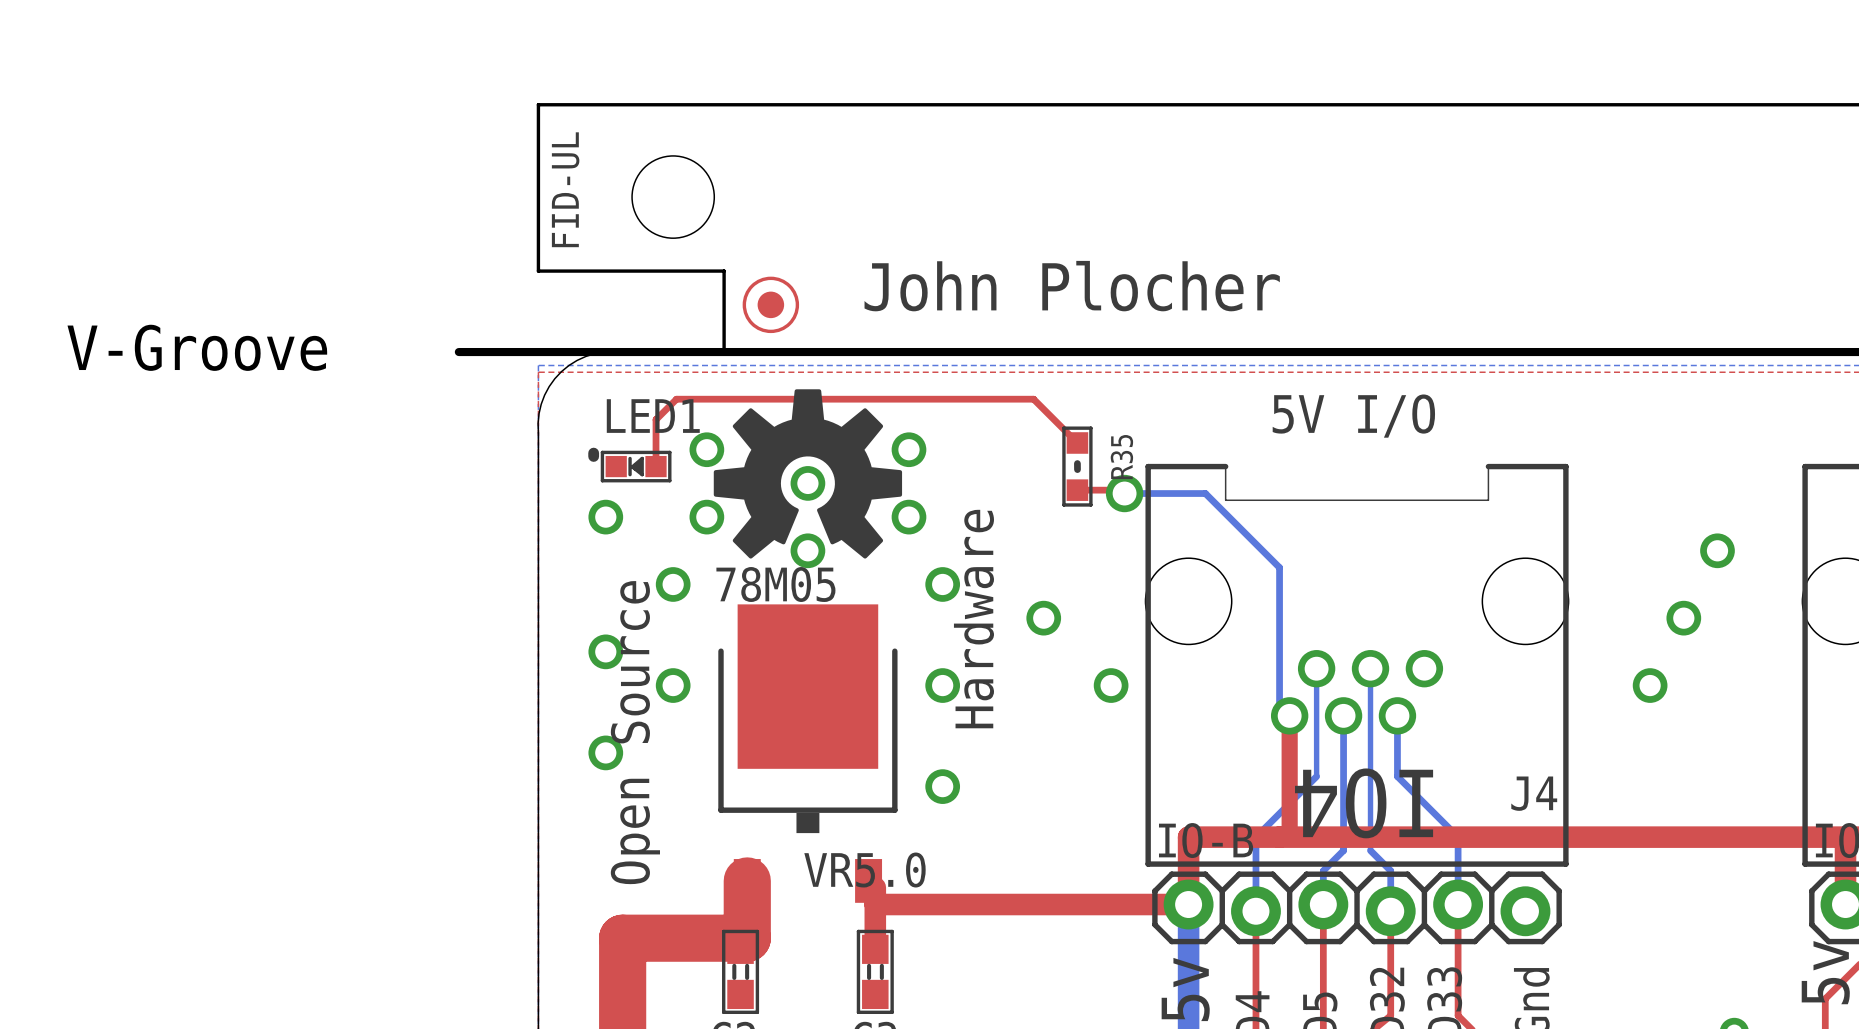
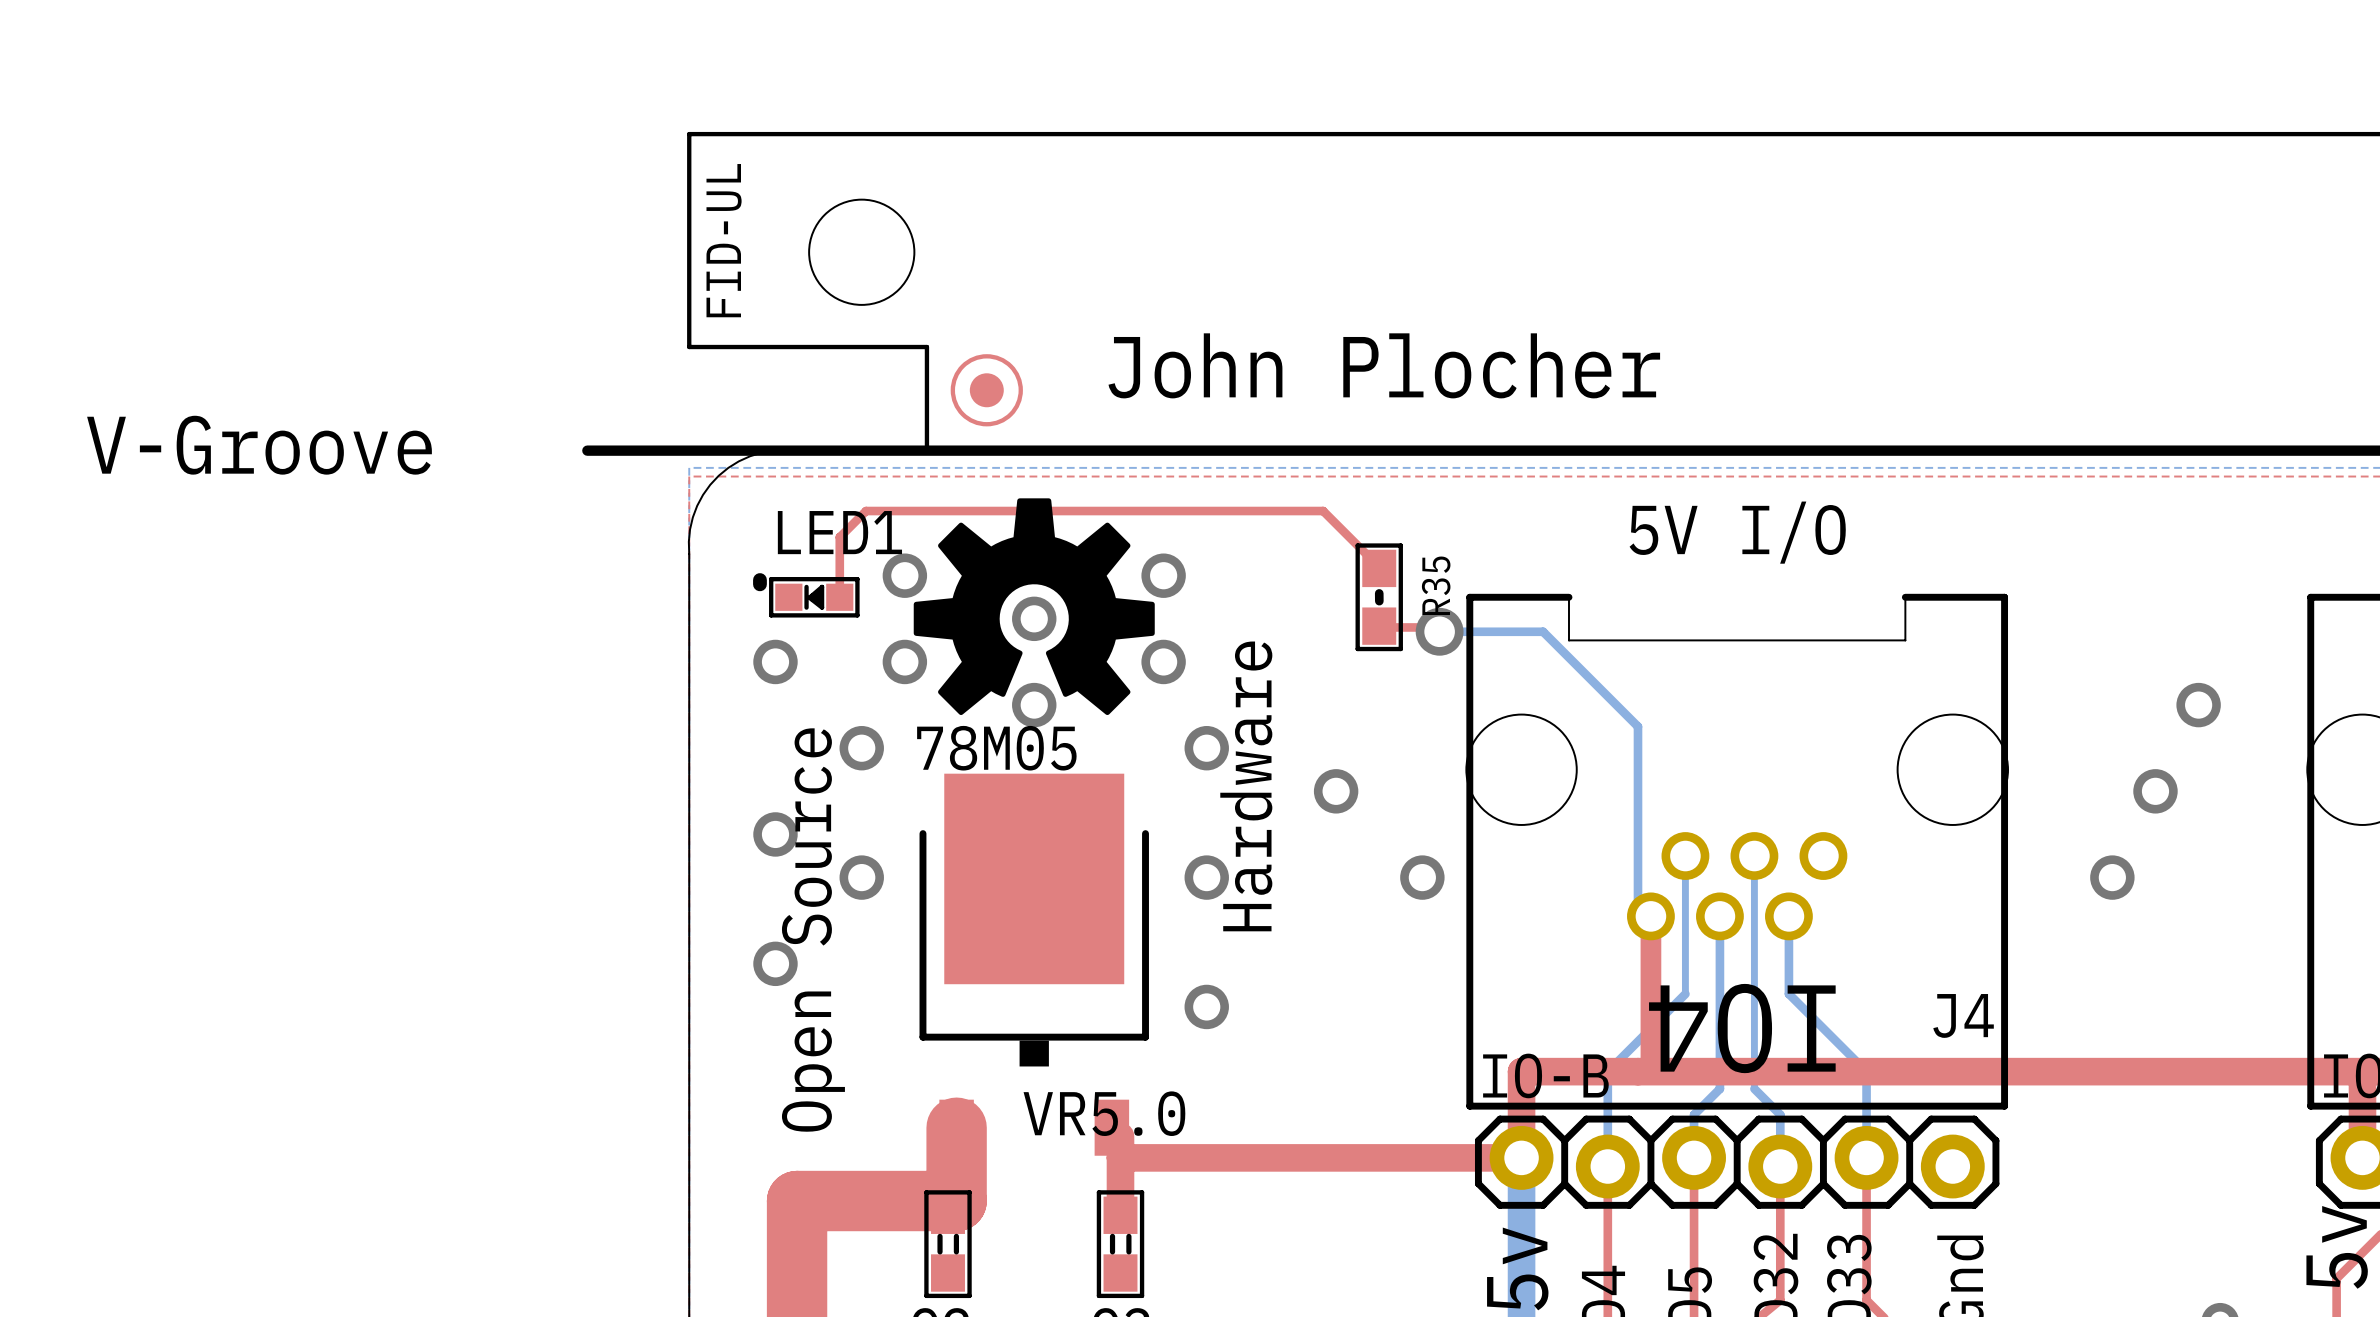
R35 footprint: [1062, 426, 1093, 507] -> [1355, 543, 1403, 652]

